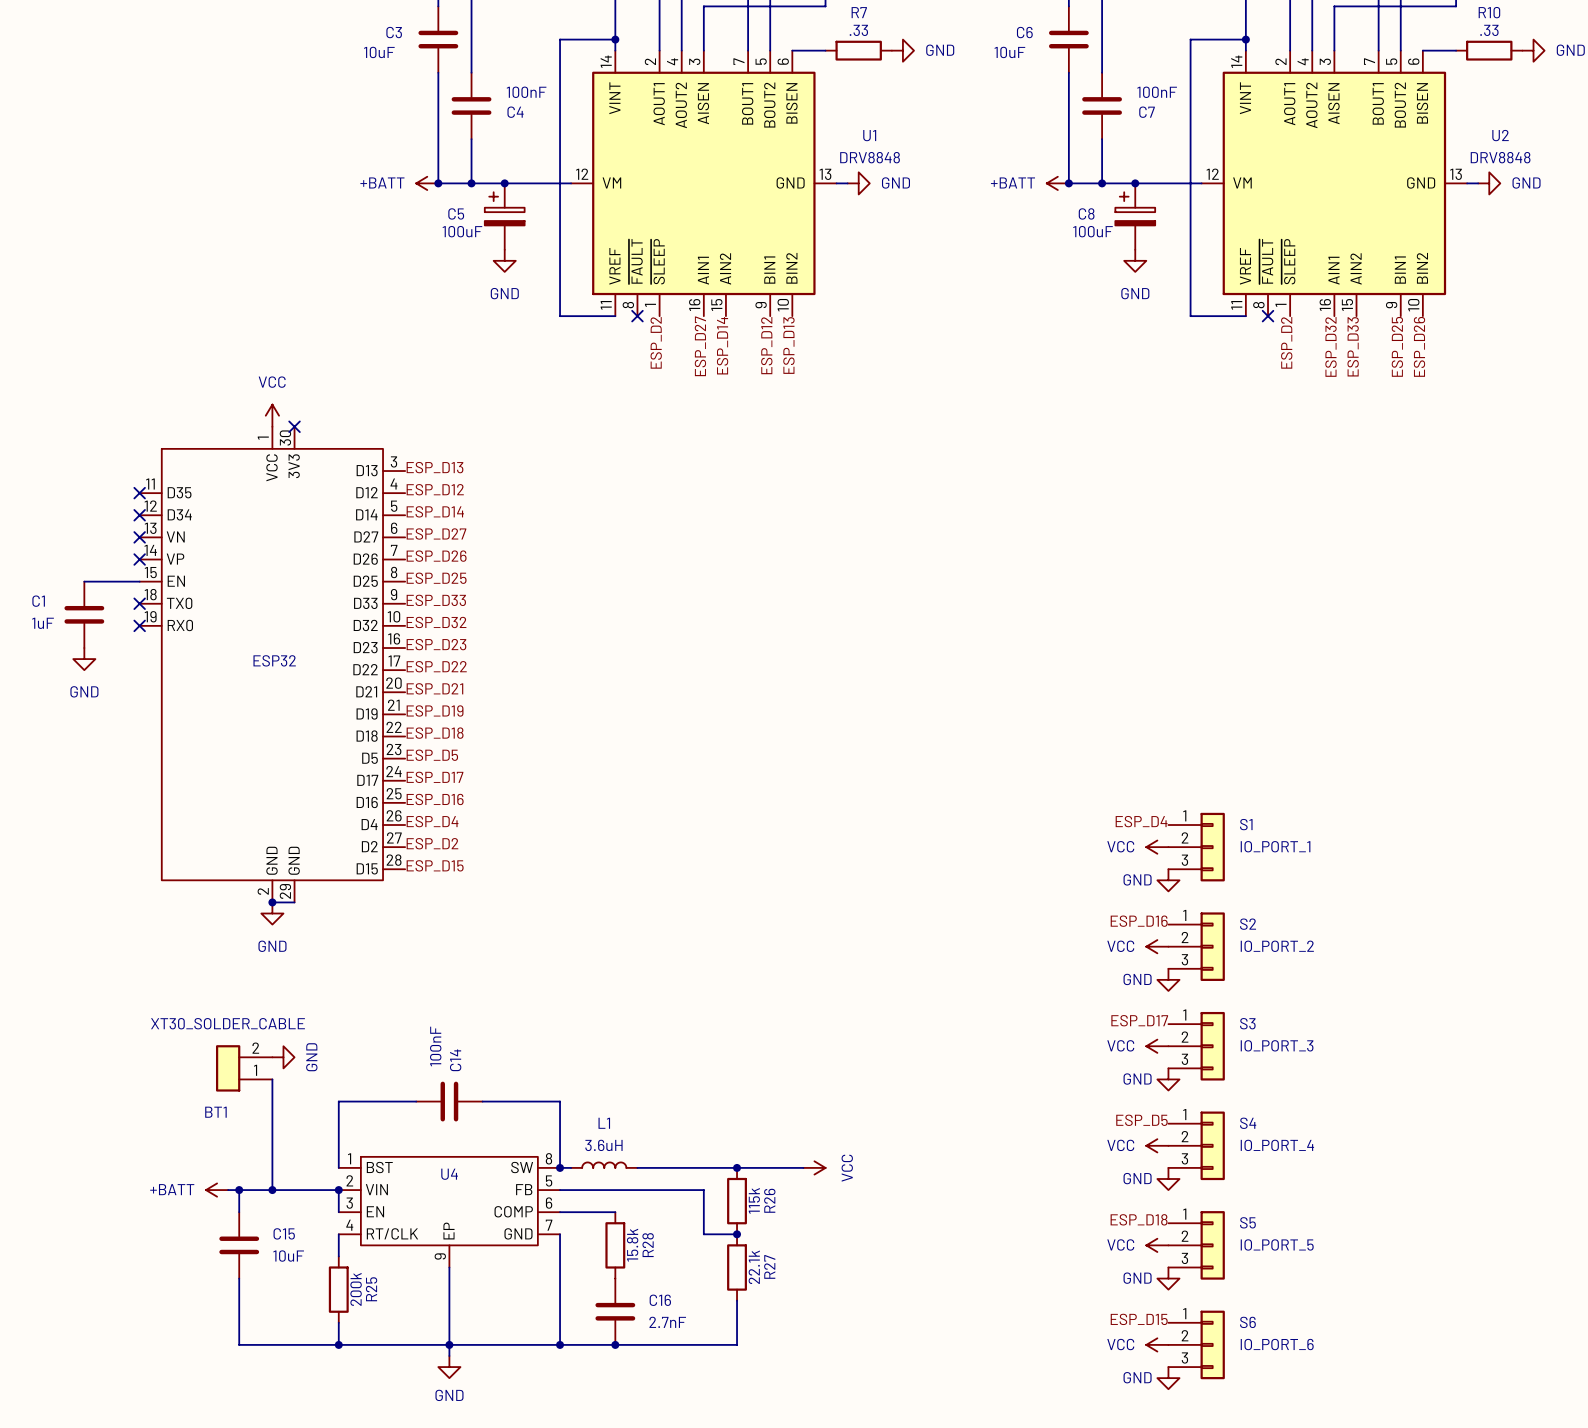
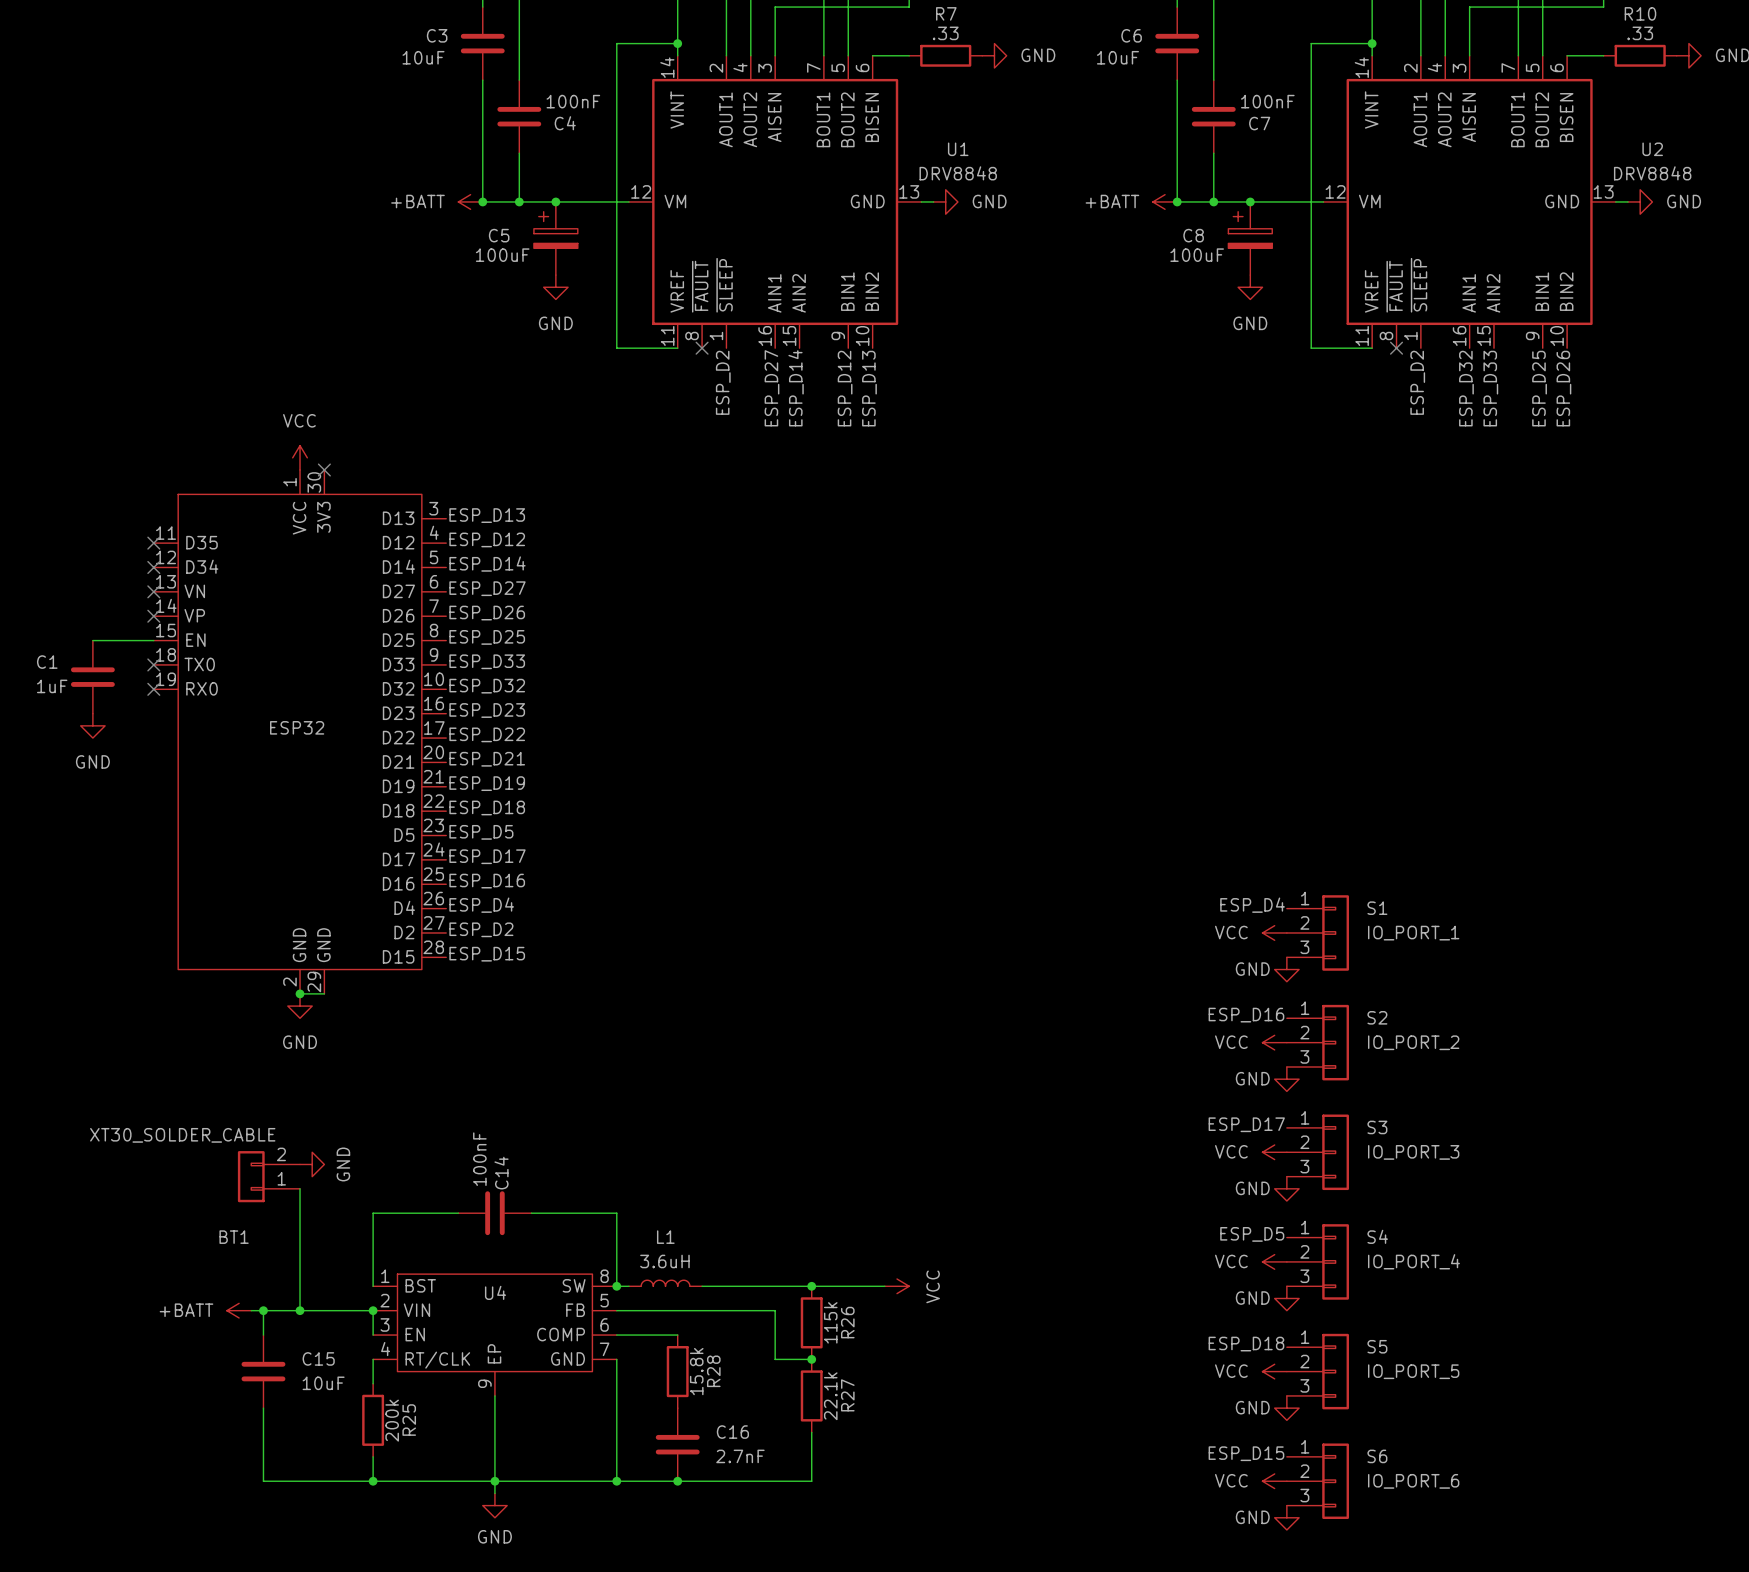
BT1 value position: XT30_SOLDER_CABLE (227, 1023) -> XT30_SOLDER_CABLE (182, 1135)
BT1 symbol: [215, 1045, 273, 1092] -> [237, 1151, 301, 1203]

